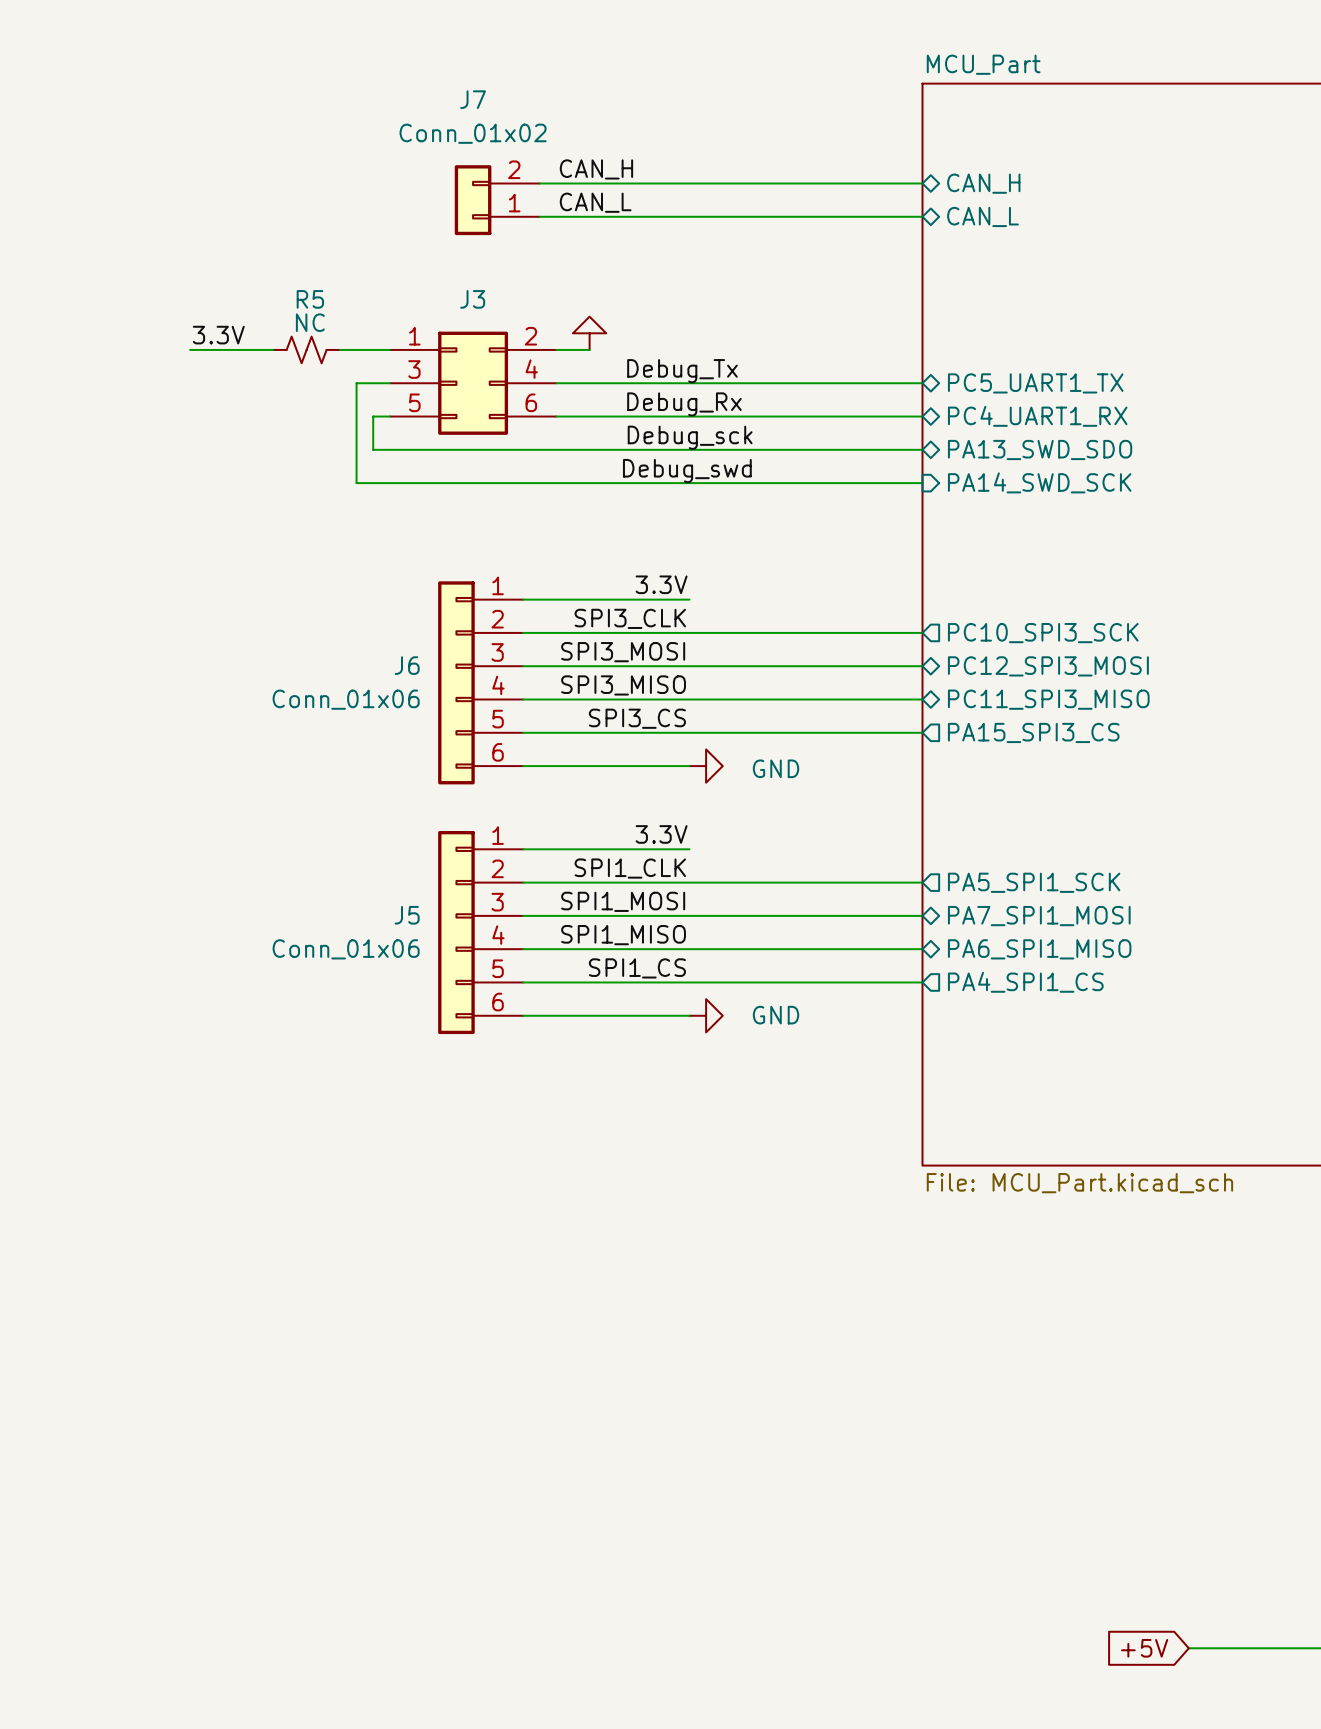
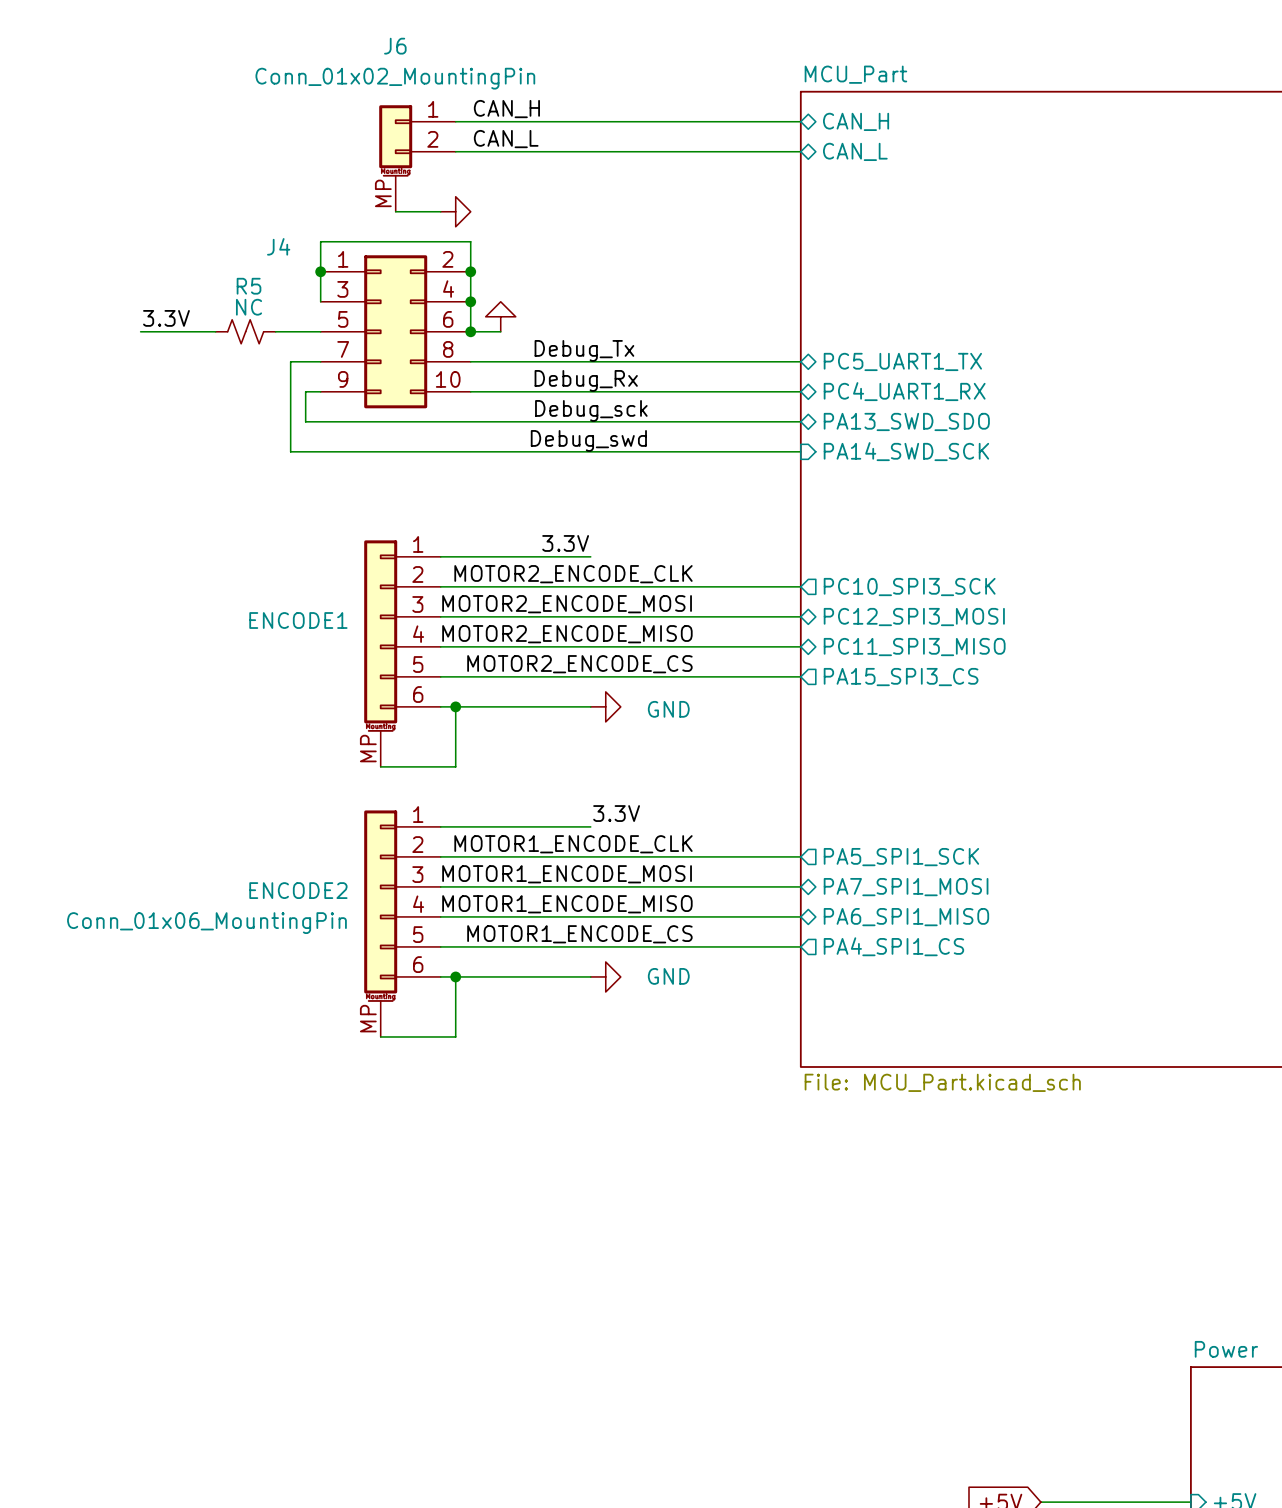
label position: CAN_H (596, 169) -> CAN_H (506, 109)
wire: (539, 183) (922, 183) -> (455, 121) (800, 121)
sheet pin position: CAN_H (983, 183) -> CAN_H (856, 121)
J7: Conn_01x02 (497, 200) -> none
label position: CAN_L (595, 202) -> CAN_L (506, 139)
wire: (539, 216) (922, 216) -> (455, 151) (800, 151)
power symbol: none -> (455, 211)
sheet pin position: CAN_L (983, 216) -> CAN_L (855, 151)
junction: none -> (320, 271)
junction: none -> (470, 271)
wire: none -> (320, 301) (320, 241) (470, 241) (470, 331)
junction: none -> (470, 301)
J4: none -> (395, 331)
junction: none -> (470, 331)
J3: (473, 383) -> none
J6 symbol: [438, 581, 524, 785] -> [379, 105, 456, 212]
label: SPI3_CLK (630, 618) -> none
label: none -> MOTOR2_ENCODE_CLK (573, 574)
label: SPI3_MOSI (623, 652) -> none
label: none -> MOTOR2_ENCODE_MOSI (567, 604)
J6 name position: J6 (407, 665) -> J6 (395, 46)
label: SPI3_MISO (623, 685) -> none
label: none -> MOTOR2_ENCODE_MISO (567, 634)
J6 value: Conn_01x06 (346, 699) -> Conn_01x02_MountingPin (395, 78)
ENCODE1: none -> (402, 653)
label: SPI3_CS (637, 718) -> none
label: none -> MOTOR2_ENCODE_CS (579, 664)
wire: none -> (455, 706) (455, 766) (380, 766)
junction: none -> (455, 706)
label position: 3.3V (661, 834) -> 3.3V (616, 813)
wire: (523, 849) (689, 849) -> (440, 826) (590, 826)
label: SPI1_CLK (630, 868) -> none
wire: (523, 882) (922, 882) -> (440, 856) (800, 856)
sheet pin position: PA5_SPI1_SCK (1034, 882) -> PA5_SPI1_SCK (901, 857)
label: SPI1_MOSI (623, 901) -> none
wire: (523, 915) (922, 915) -> (440, 886) (800, 886)
sheet pin position: PA7_SPI1_MOSI (1039, 916) -> PA7_SPI1_MOSI (906, 887)
label: none -> MOTOR1_ENCODE_CLK (573, 844)
J5: Conn_01x06 (480, 932) -> none
label: SPI1_MISO (623, 935) -> none
wire: (523, 949) (922, 949) -> (440, 916) (800, 916)
sheet pin position: PA6_SPI1_MISO (1039, 949) -> PA6_SPI1_MISO (906, 917)
label: none -> MOTOR1_ENCODE_MOSI (567, 874)
label: SPI1_CS (637, 968) -> none
wire: (523, 982) (922, 982) -> (440, 946) (800, 946)
sheet pin position: PA4_SPI1_CS (1025, 982) -> PA4_SPI1_CS (893, 946)
label: none -> MOTOR1_ENCODE_MISO (567, 904)
ENCODE2: none -> Conn_01x06_MountingPin (402, 923)
wire: (523, 1015) (689, 1015) -> (440, 976) (590, 976)
power symbol position: GND (706, 1015) -> GND (605, 976)
label: none -> MOTOR1_ENCODE_CS (579, 934)
wire: none -> (455, 976) (455, 1036) (380, 1036)
junction: none -> (455, 976)

